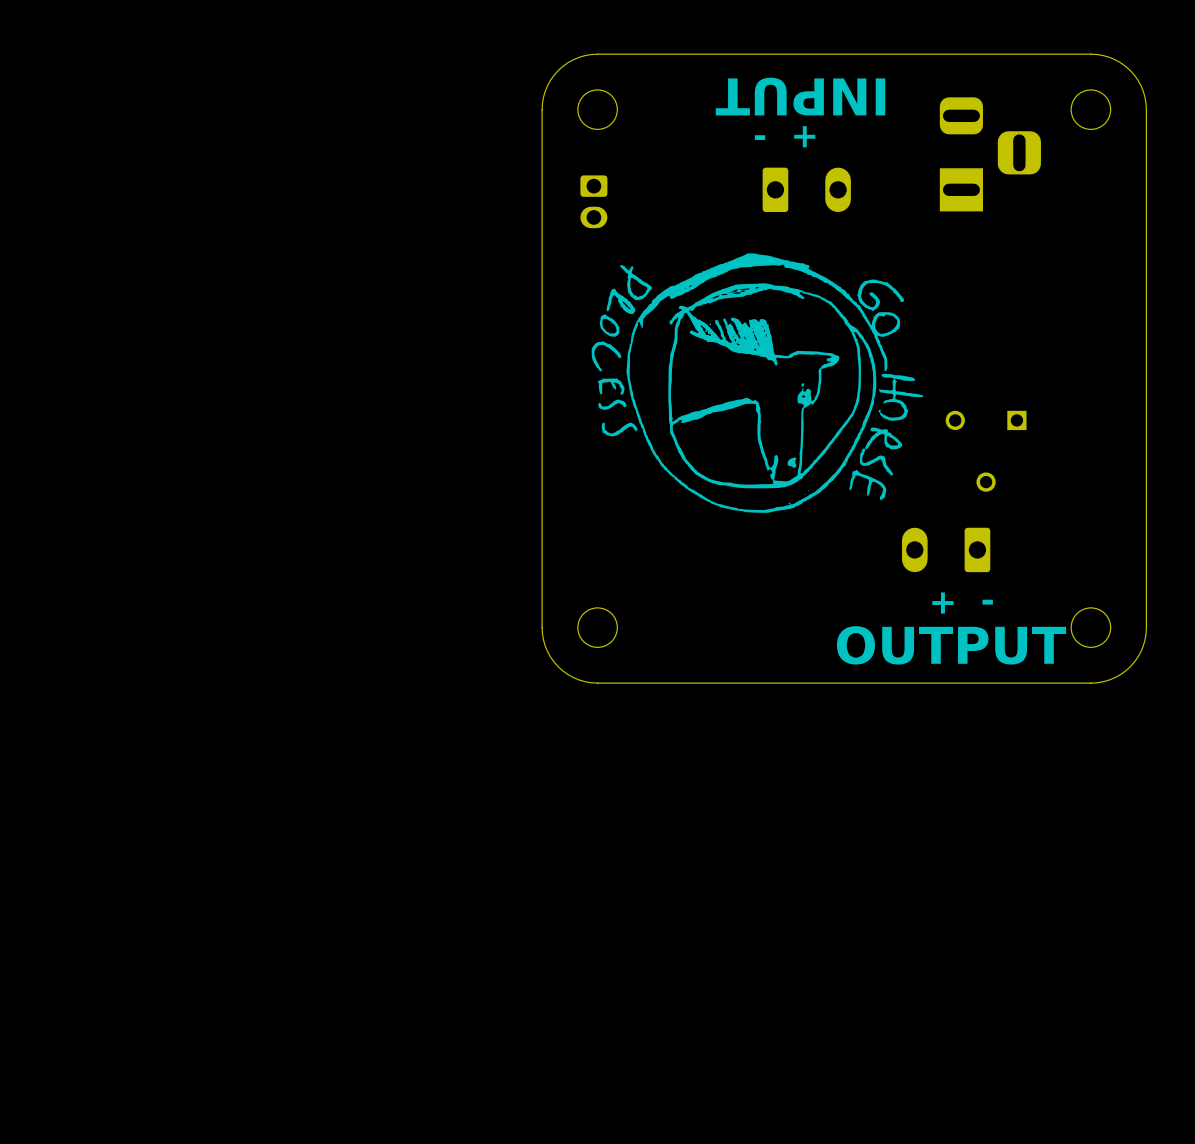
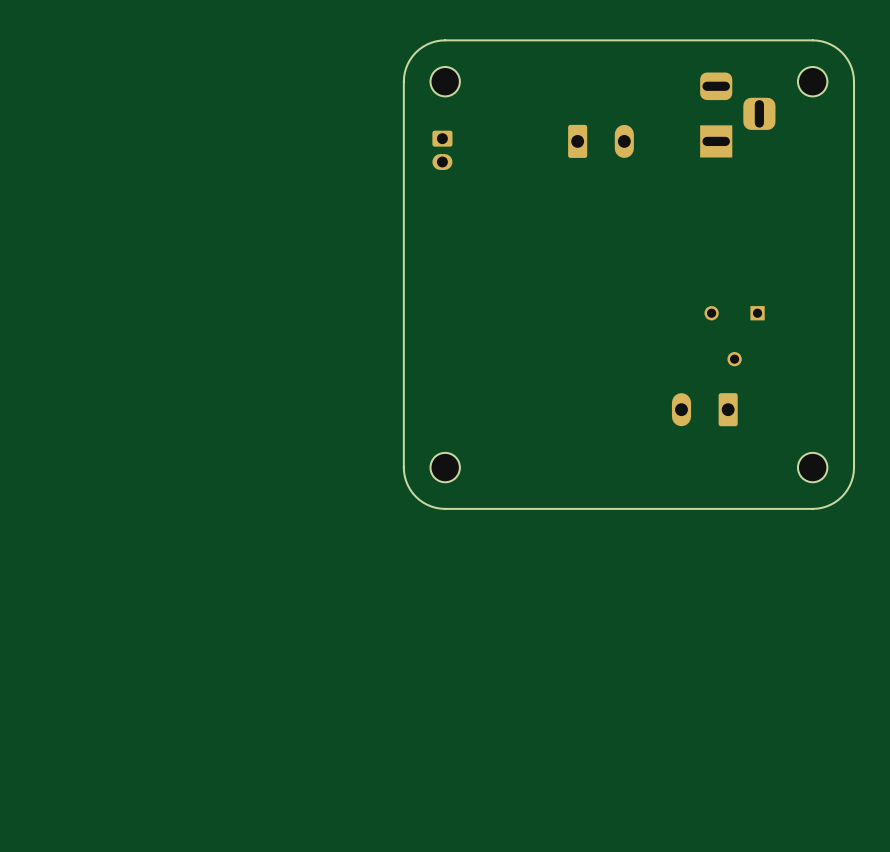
text: INPUT (800, 96) -> none
text: - + (785, 136) -> none
drawing: [591, 253, 924, 513] -> none
text: - + (962, 603) -> none
text: OUTPUT (951, 645) -> none

